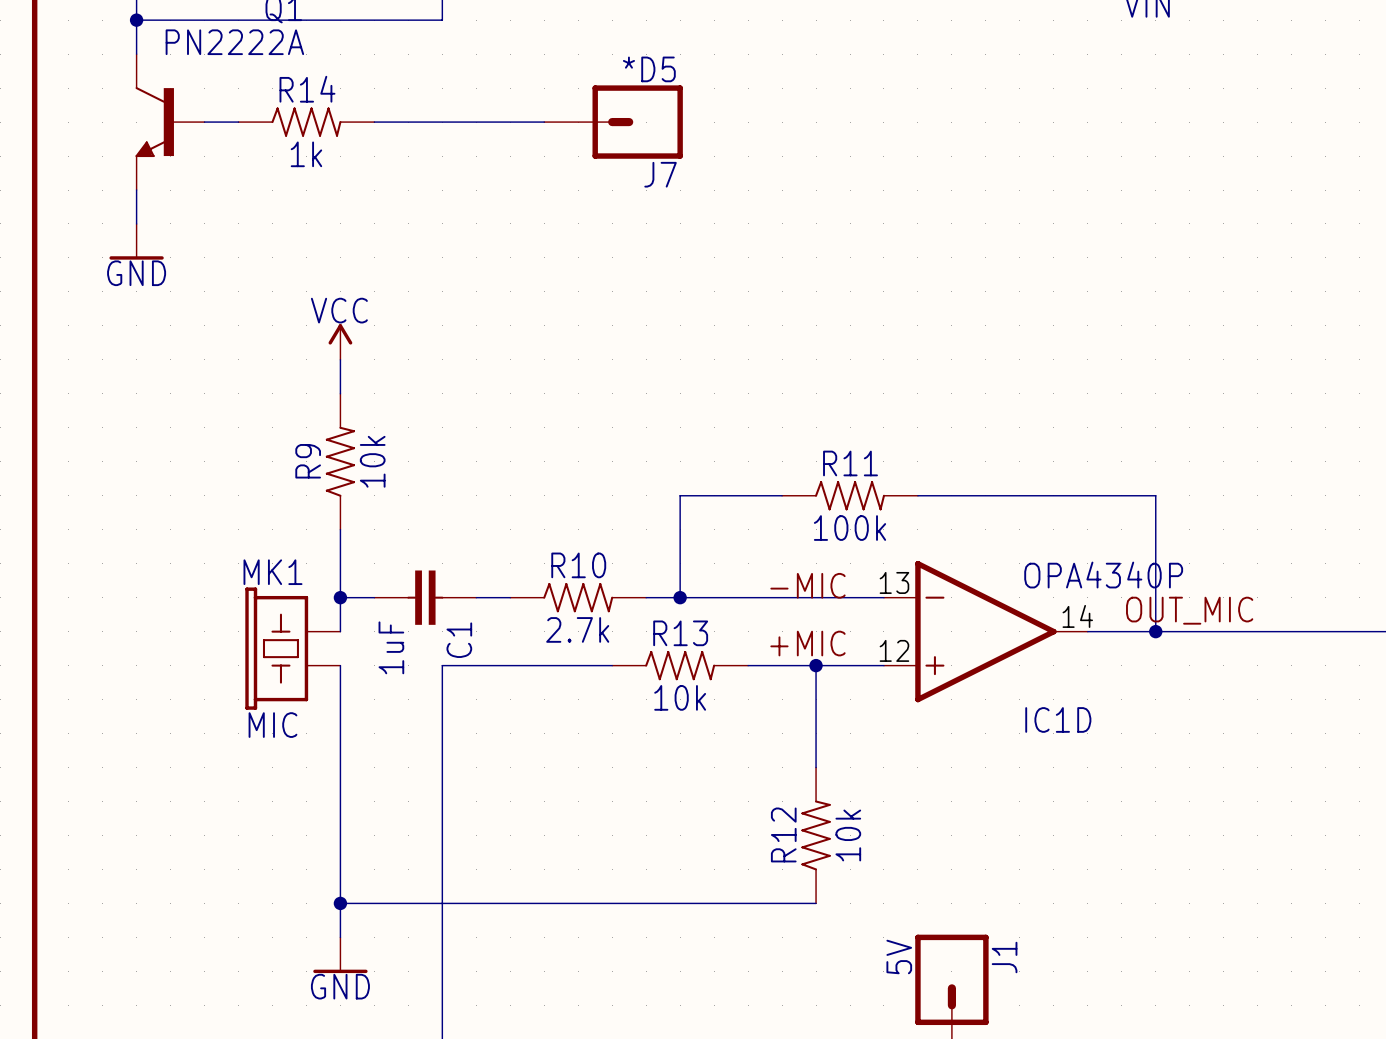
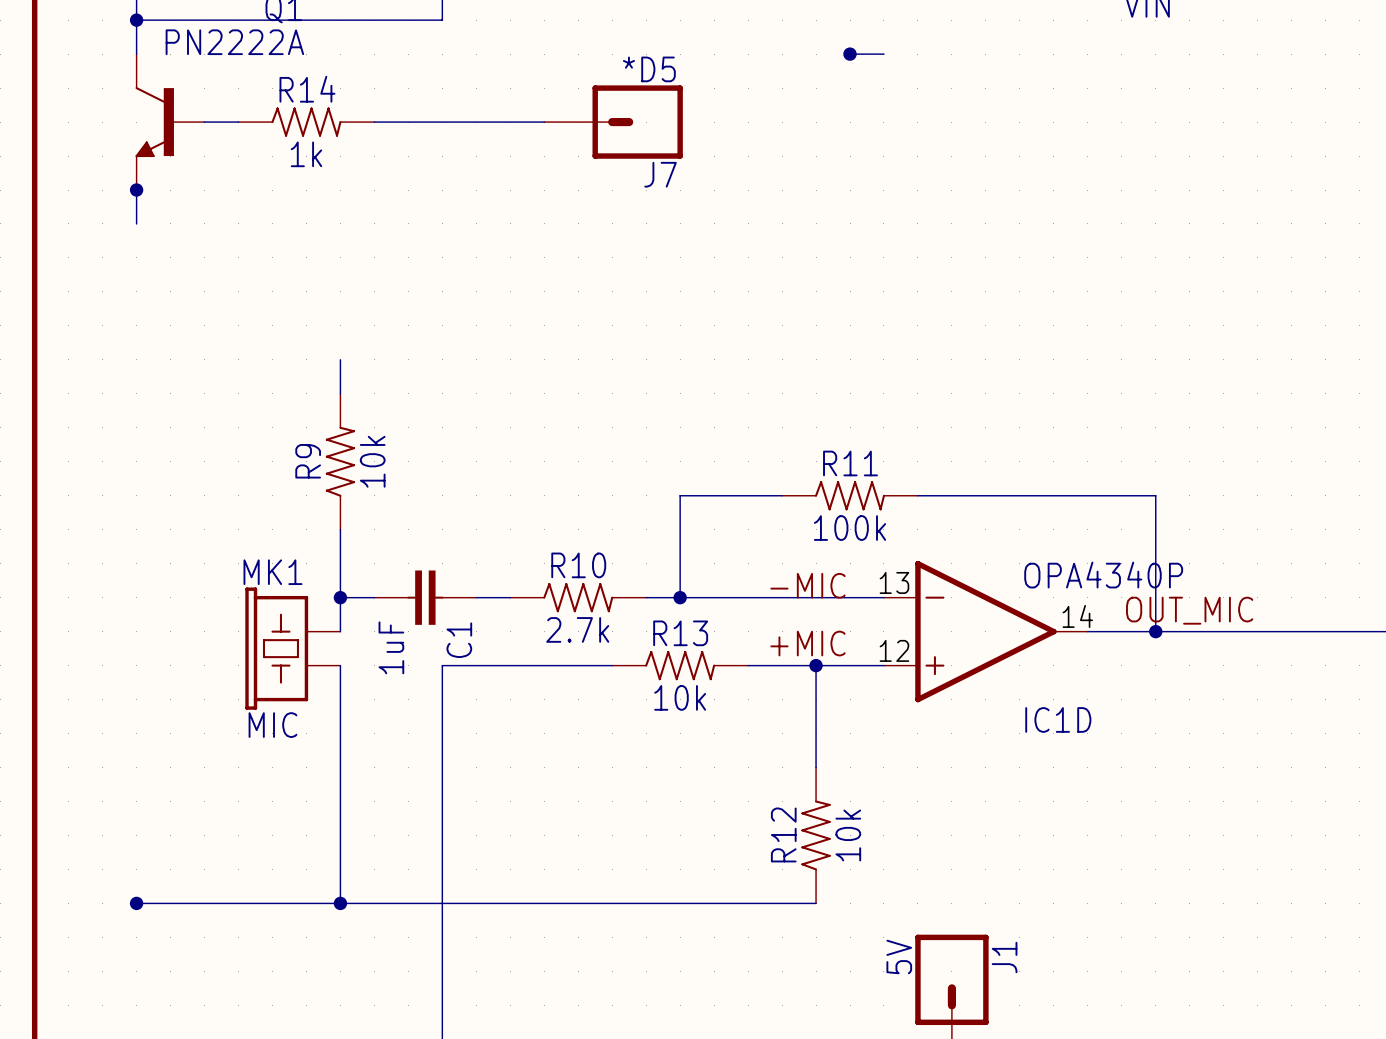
wire: none -> (850, 54) (883, 54)
junction: none -> (850, 54)
junction: none -> (136, 190)
power symbol: GND (136, 241) -> none
power symbol: VCC (340, 342) -> none
junction: none -> (136, 903)
wire: (340, 903) (340, 937) -> (340, 903) (136, 903)
power symbol: GND (340, 955) -> none

